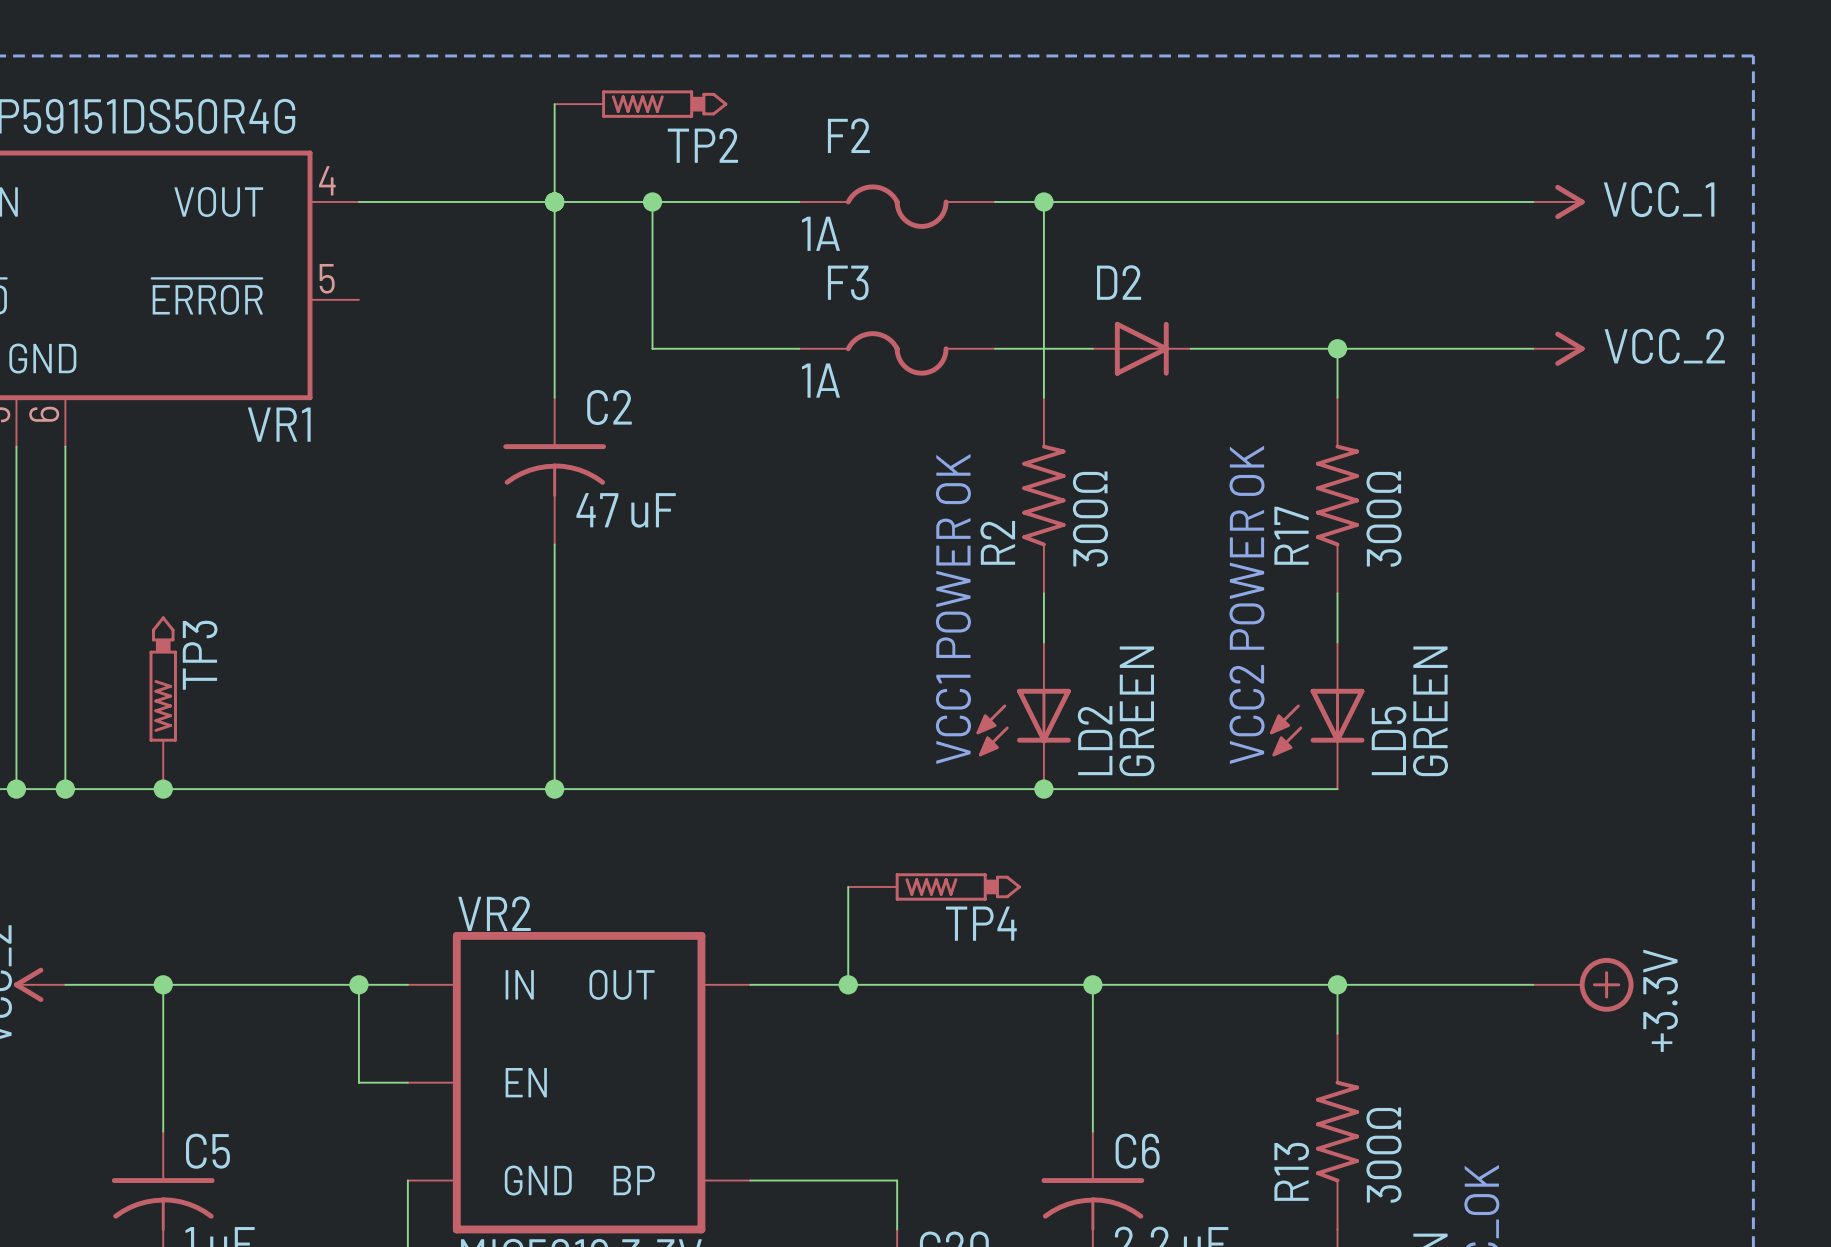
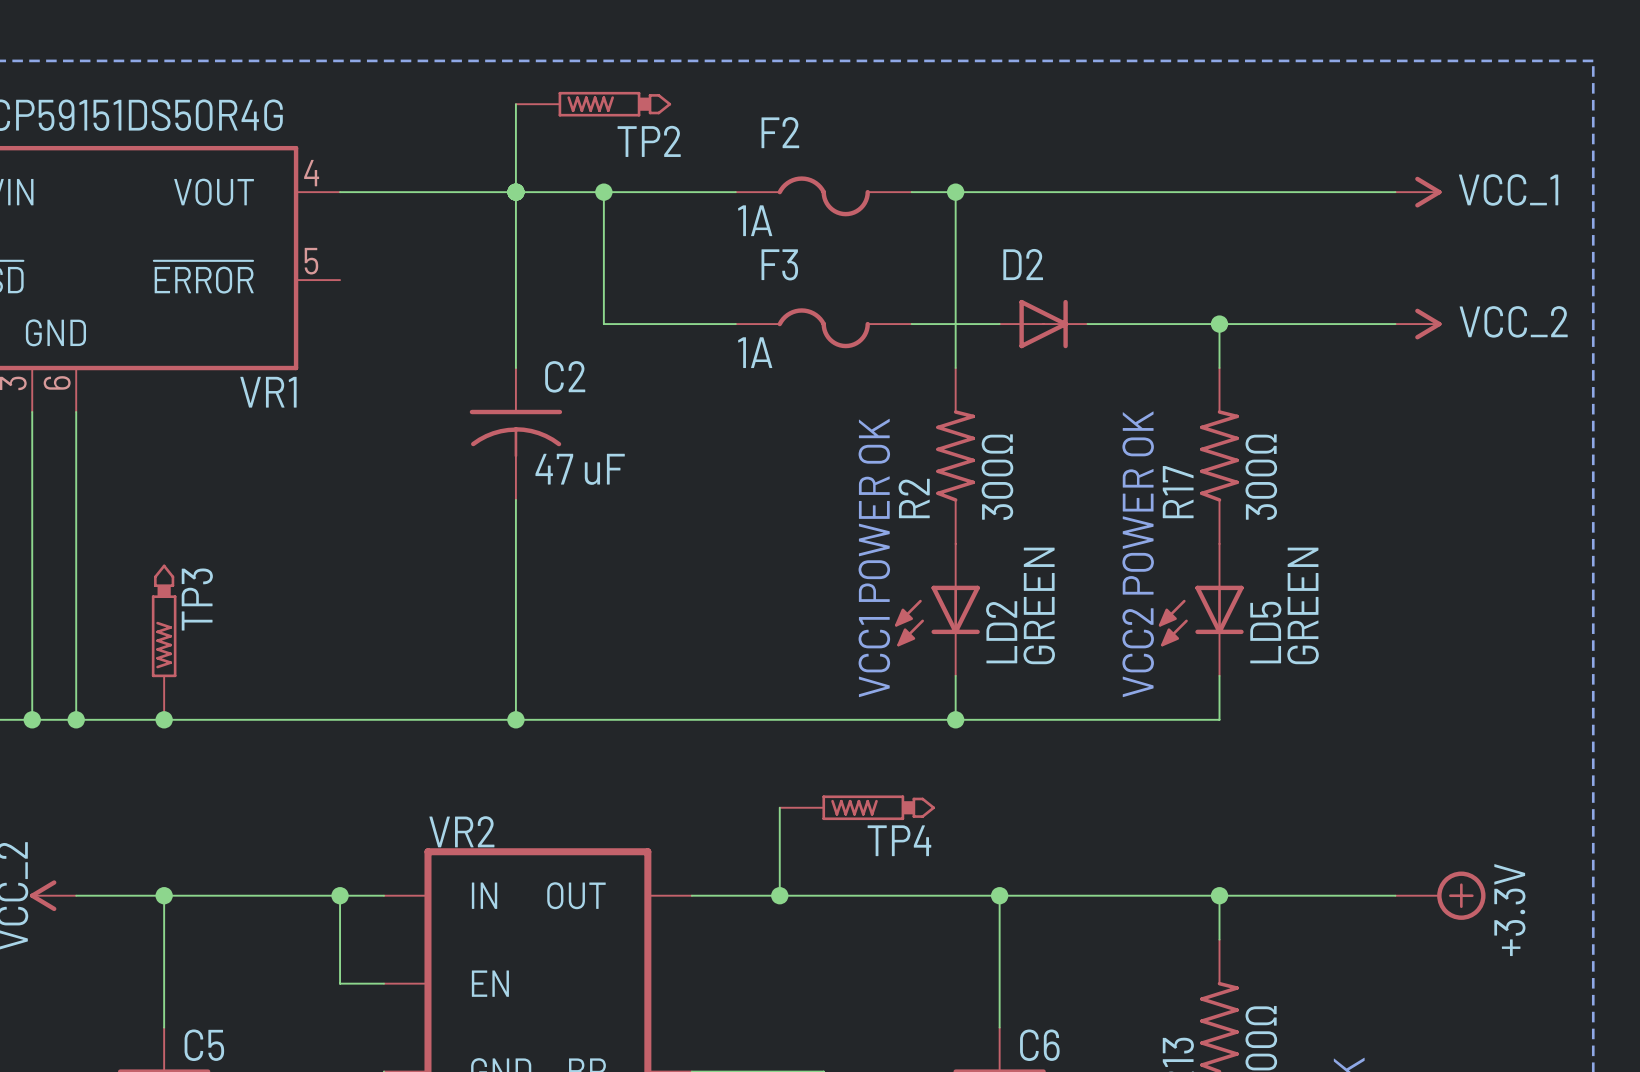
LD2 position: (1023, 715) -> (937, 609)
LD5 position: (1317, 715) -> (1201, 609)

